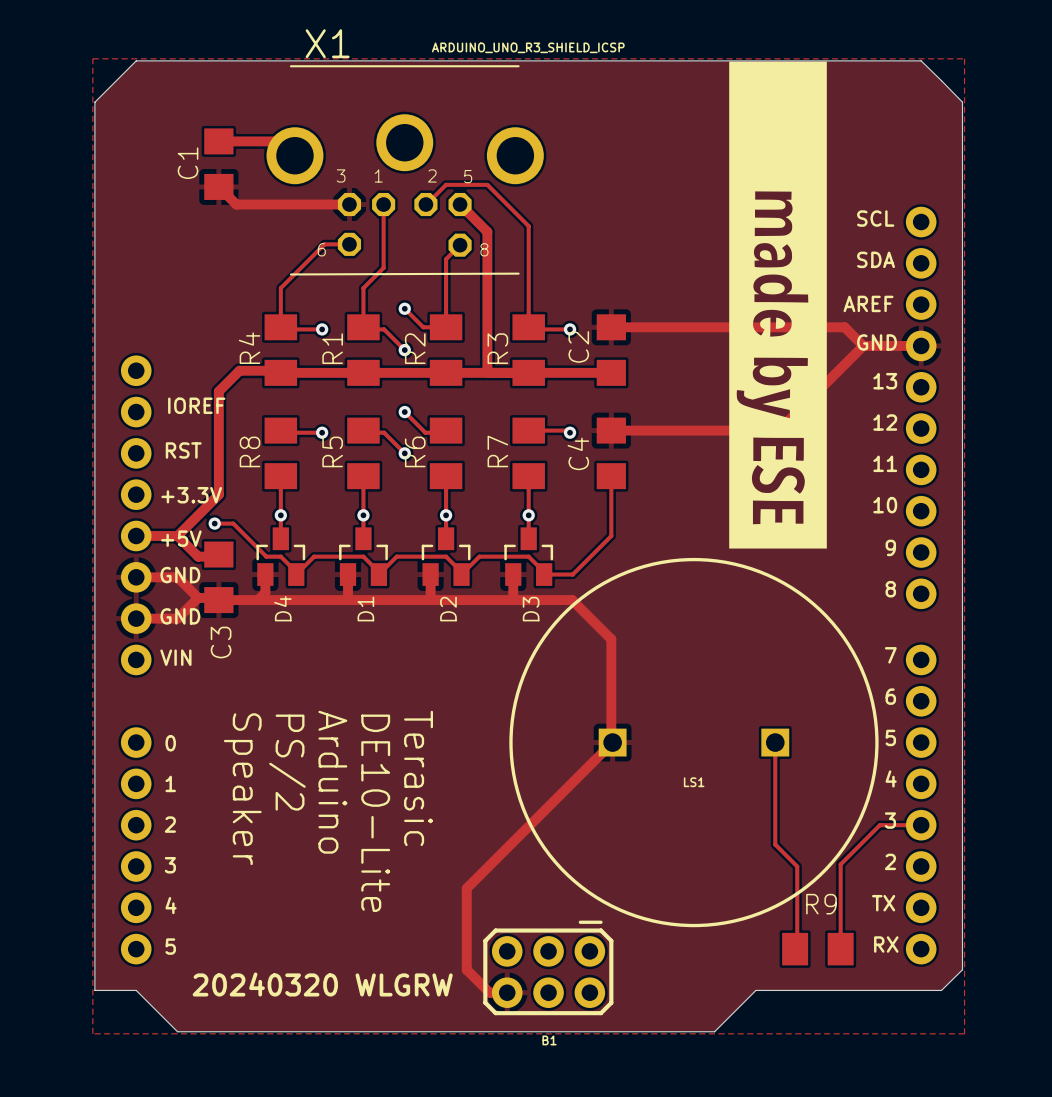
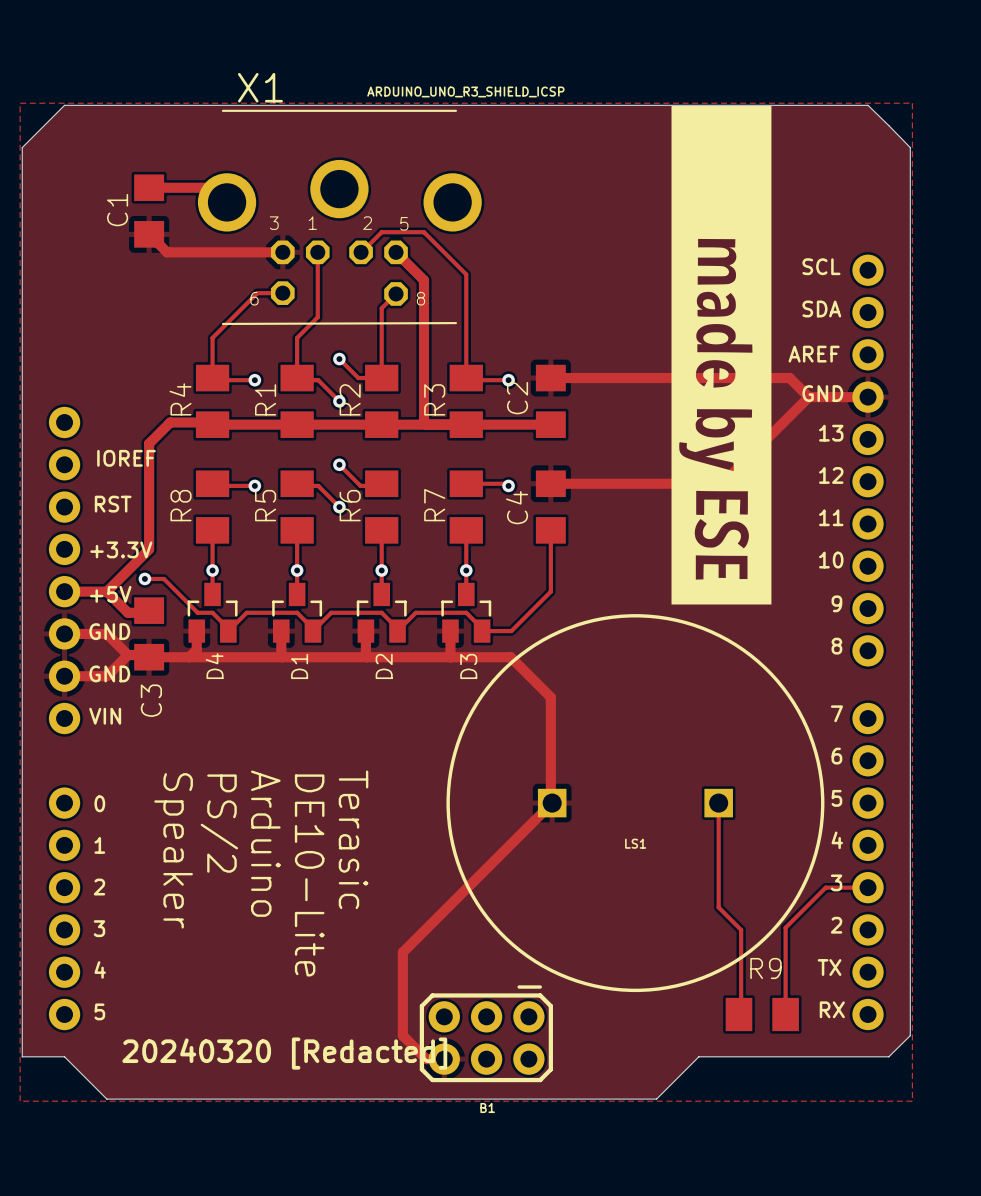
text: 20240320 WLGRW (322, 984) -> 20240320 [Redacted] (284, 1053)

